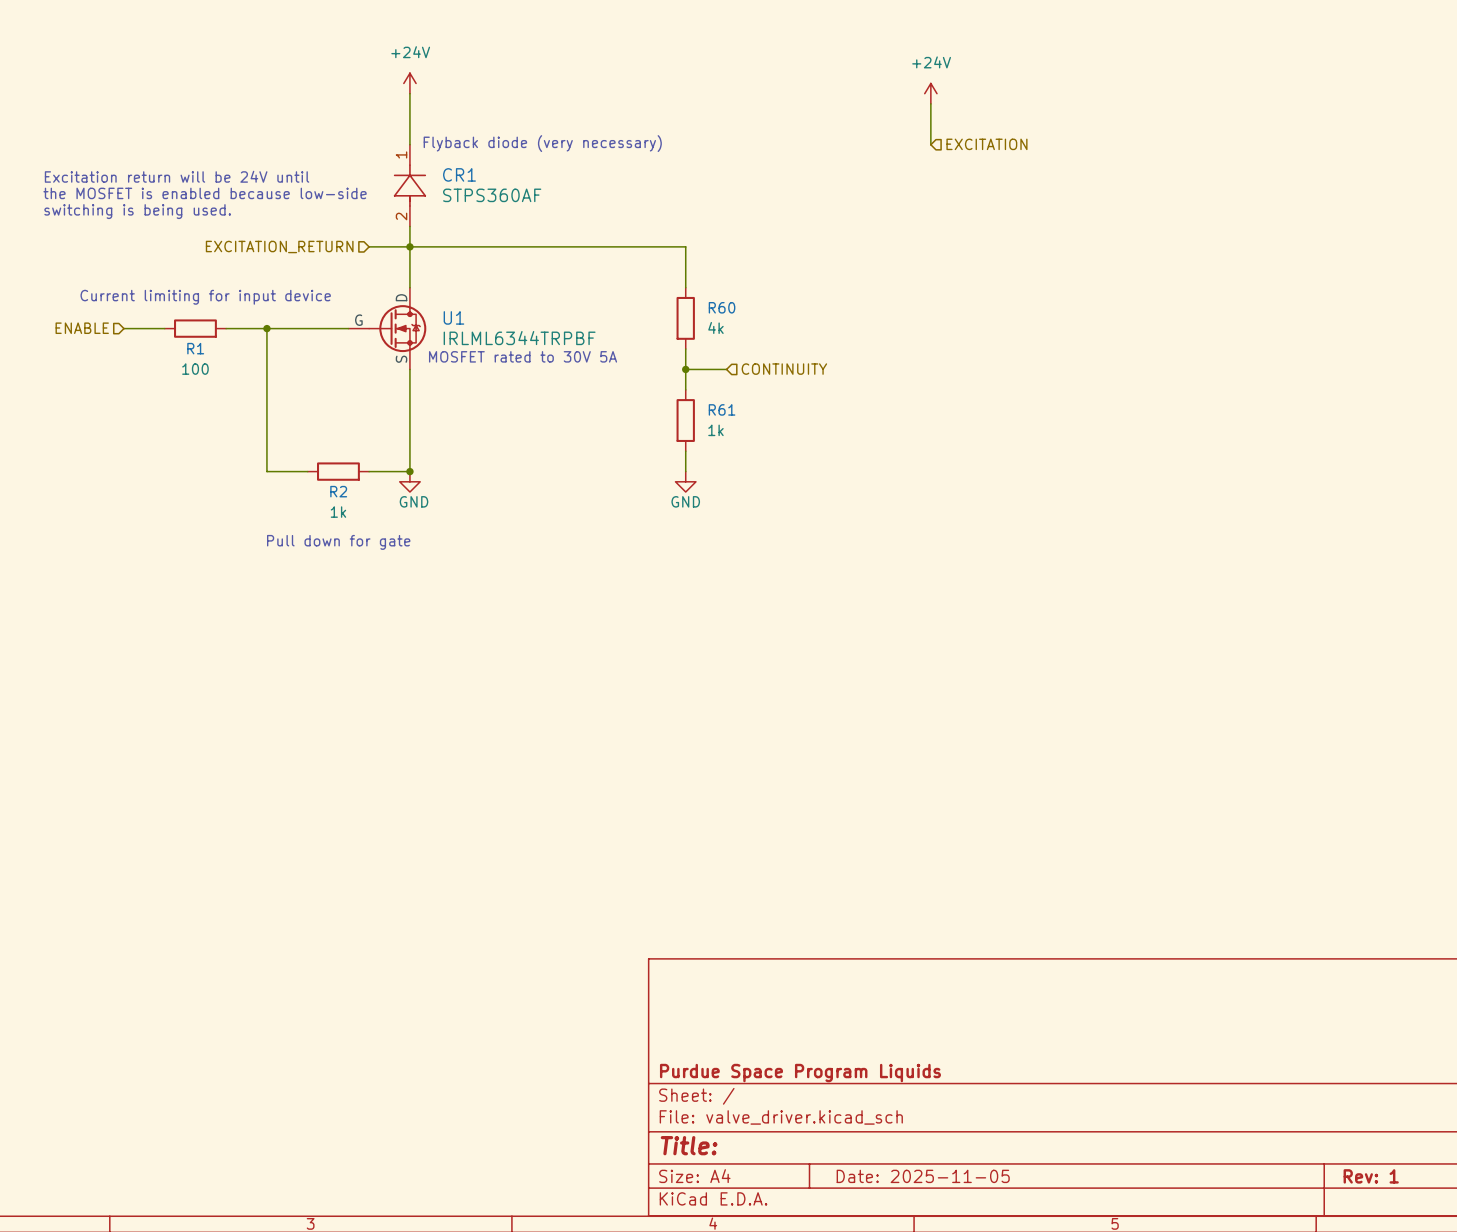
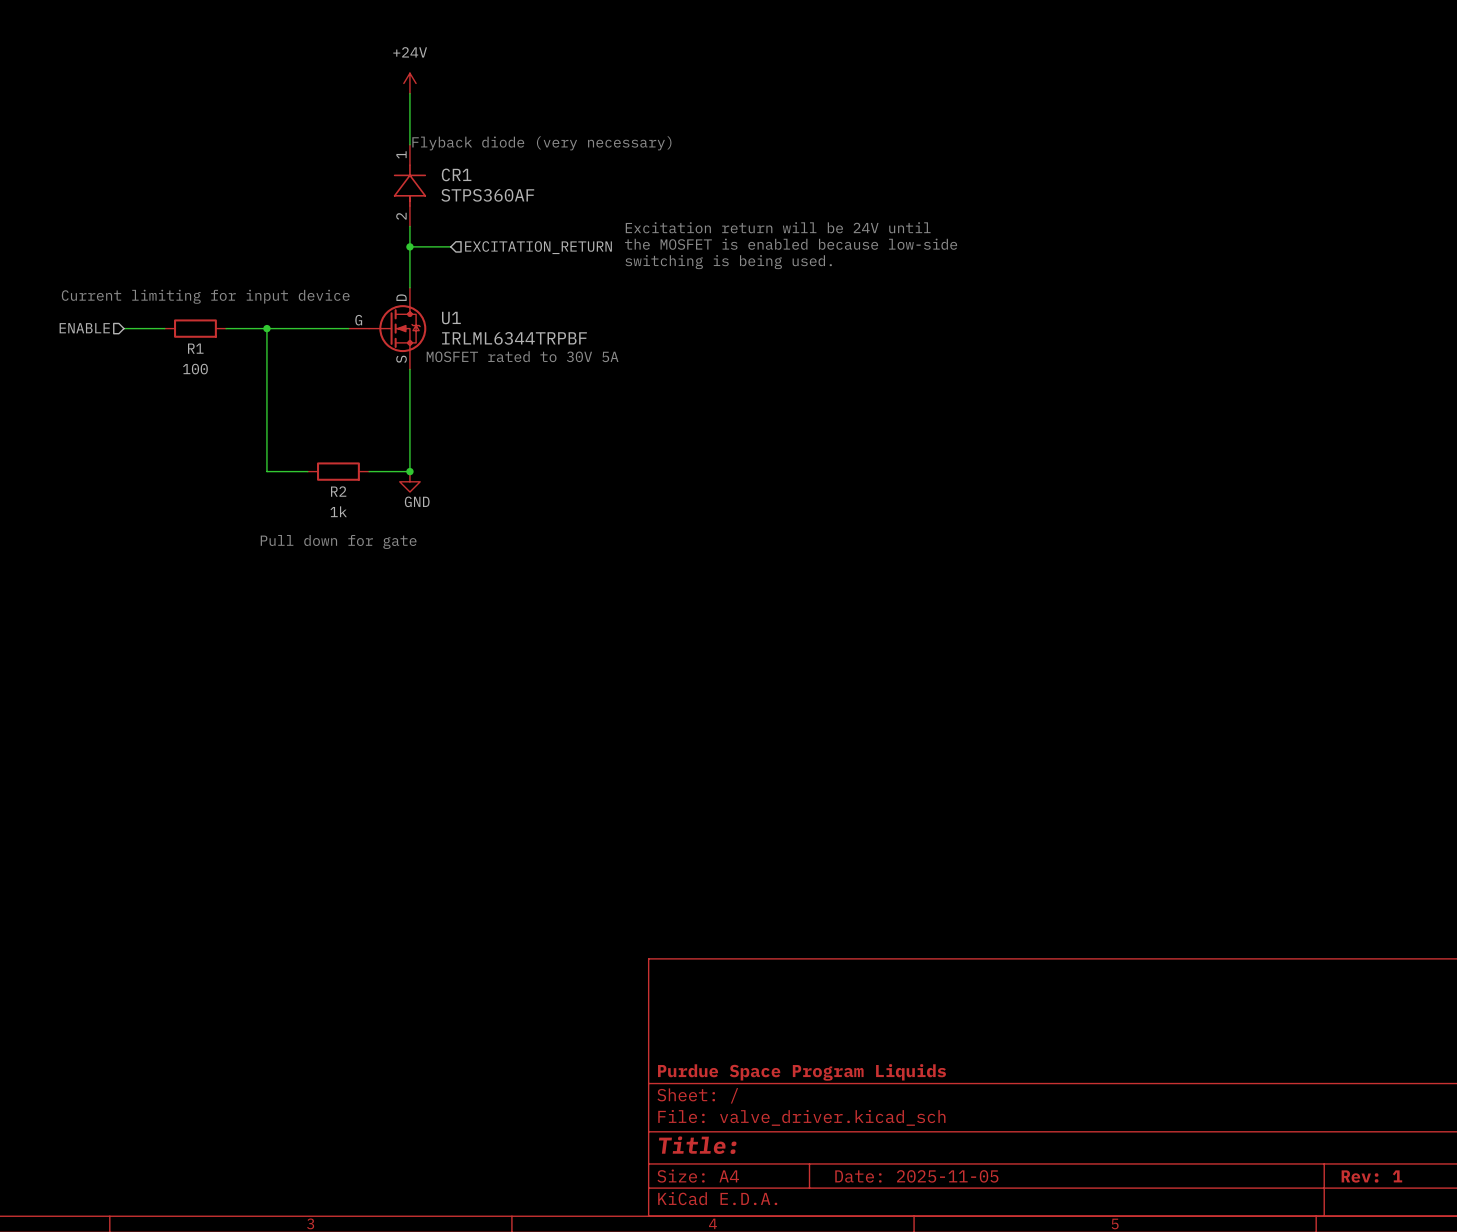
power symbol: +24V (930, 93) -> none
wire: (930, 103) (930, 144) -> none
hierarchical label: EXCITATION (986, 144) -> none
text: Excitation return will be 24V until (177, 176) -> none
text: the MOSFET is enabled because low-side (205, 193) -> none
text: switching is being used. (137, 211) -> none
text: none -> Excitation return will be 24V until (778, 227)
text: none -> the MOSFET is enabled because low-side (791, 244)
hierarchical label rotation: 0° (279, 246) -> 180° (538, 247)
hierarchical label position: EXCITATION_RETURN (279, 246) -> EXCITATION_RETURN (538, 247)
wire: (369, 246) (409, 246) -> none
wire: (450, 246) (685, 246) (685, 287) -> none
text: none -> switching is being used. (728, 262)
R60: 4k (685, 318) -> none
wire: (685, 349) (685, 389) -> none
wire: (685, 369) (726, 369) -> none
junction: (685, 369) -> none
hierarchical label: CONTINUITY (784, 369) -> none
R61: 1k (685, 420) -> none
wire: (685, 451) (685, 471) -> none
power symbol: GND (685, 481) -> none

